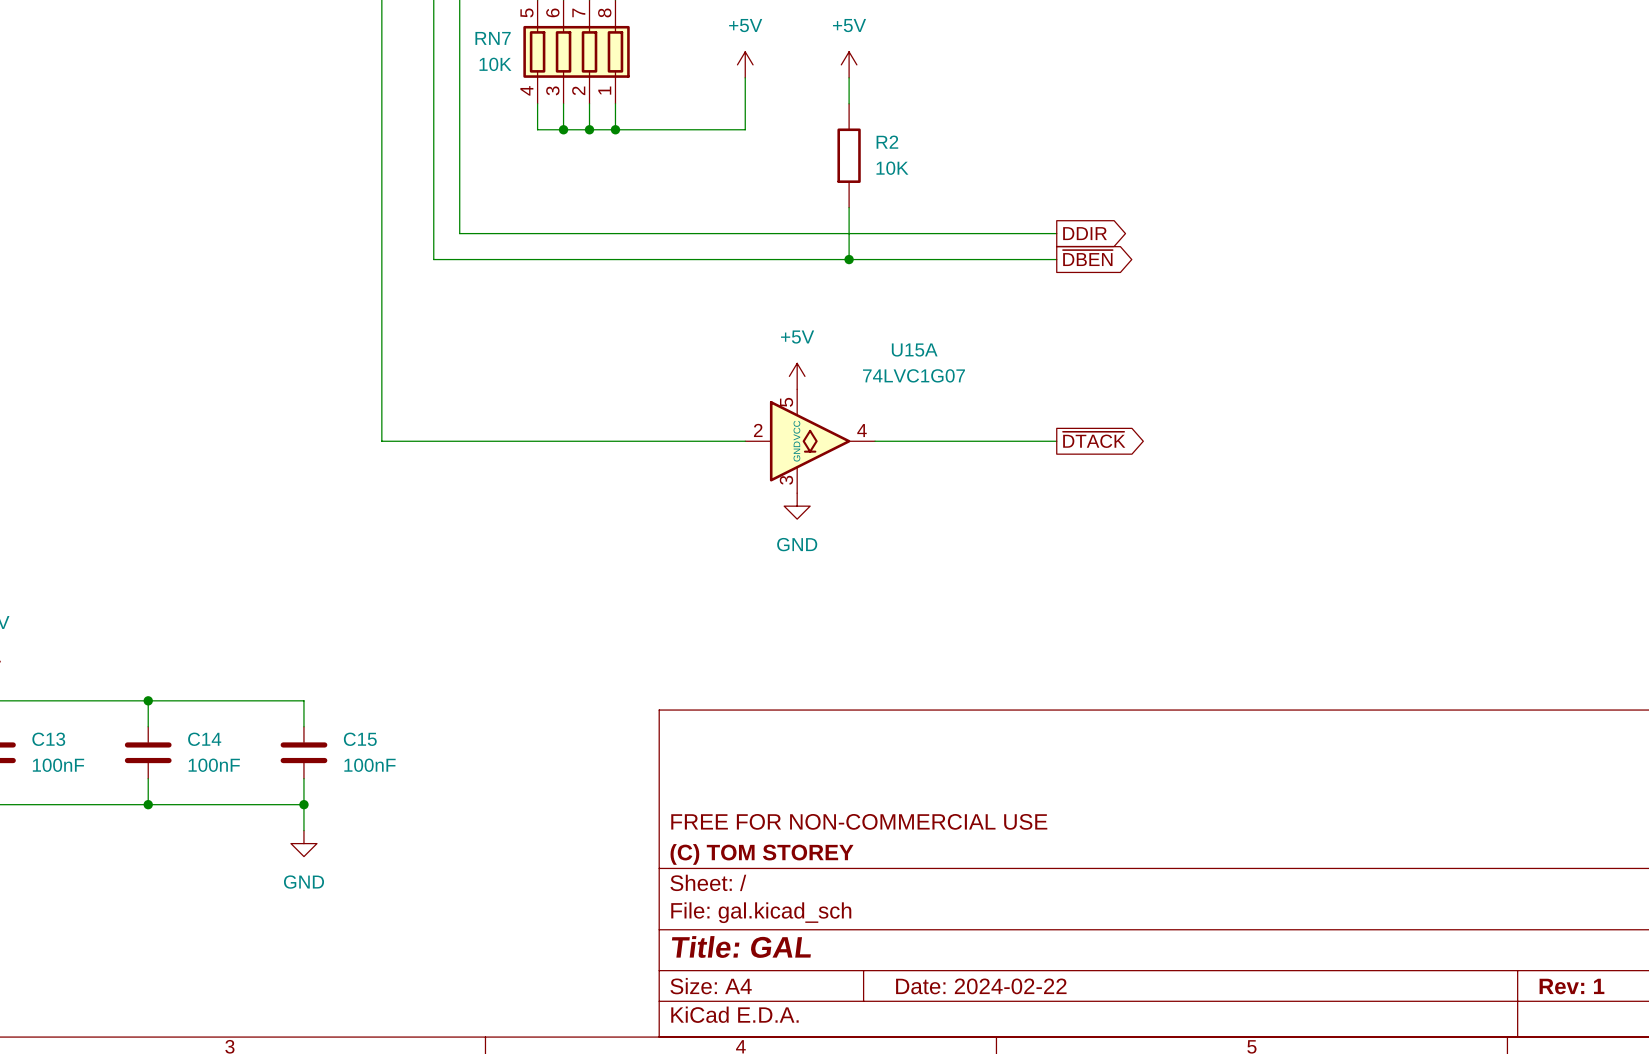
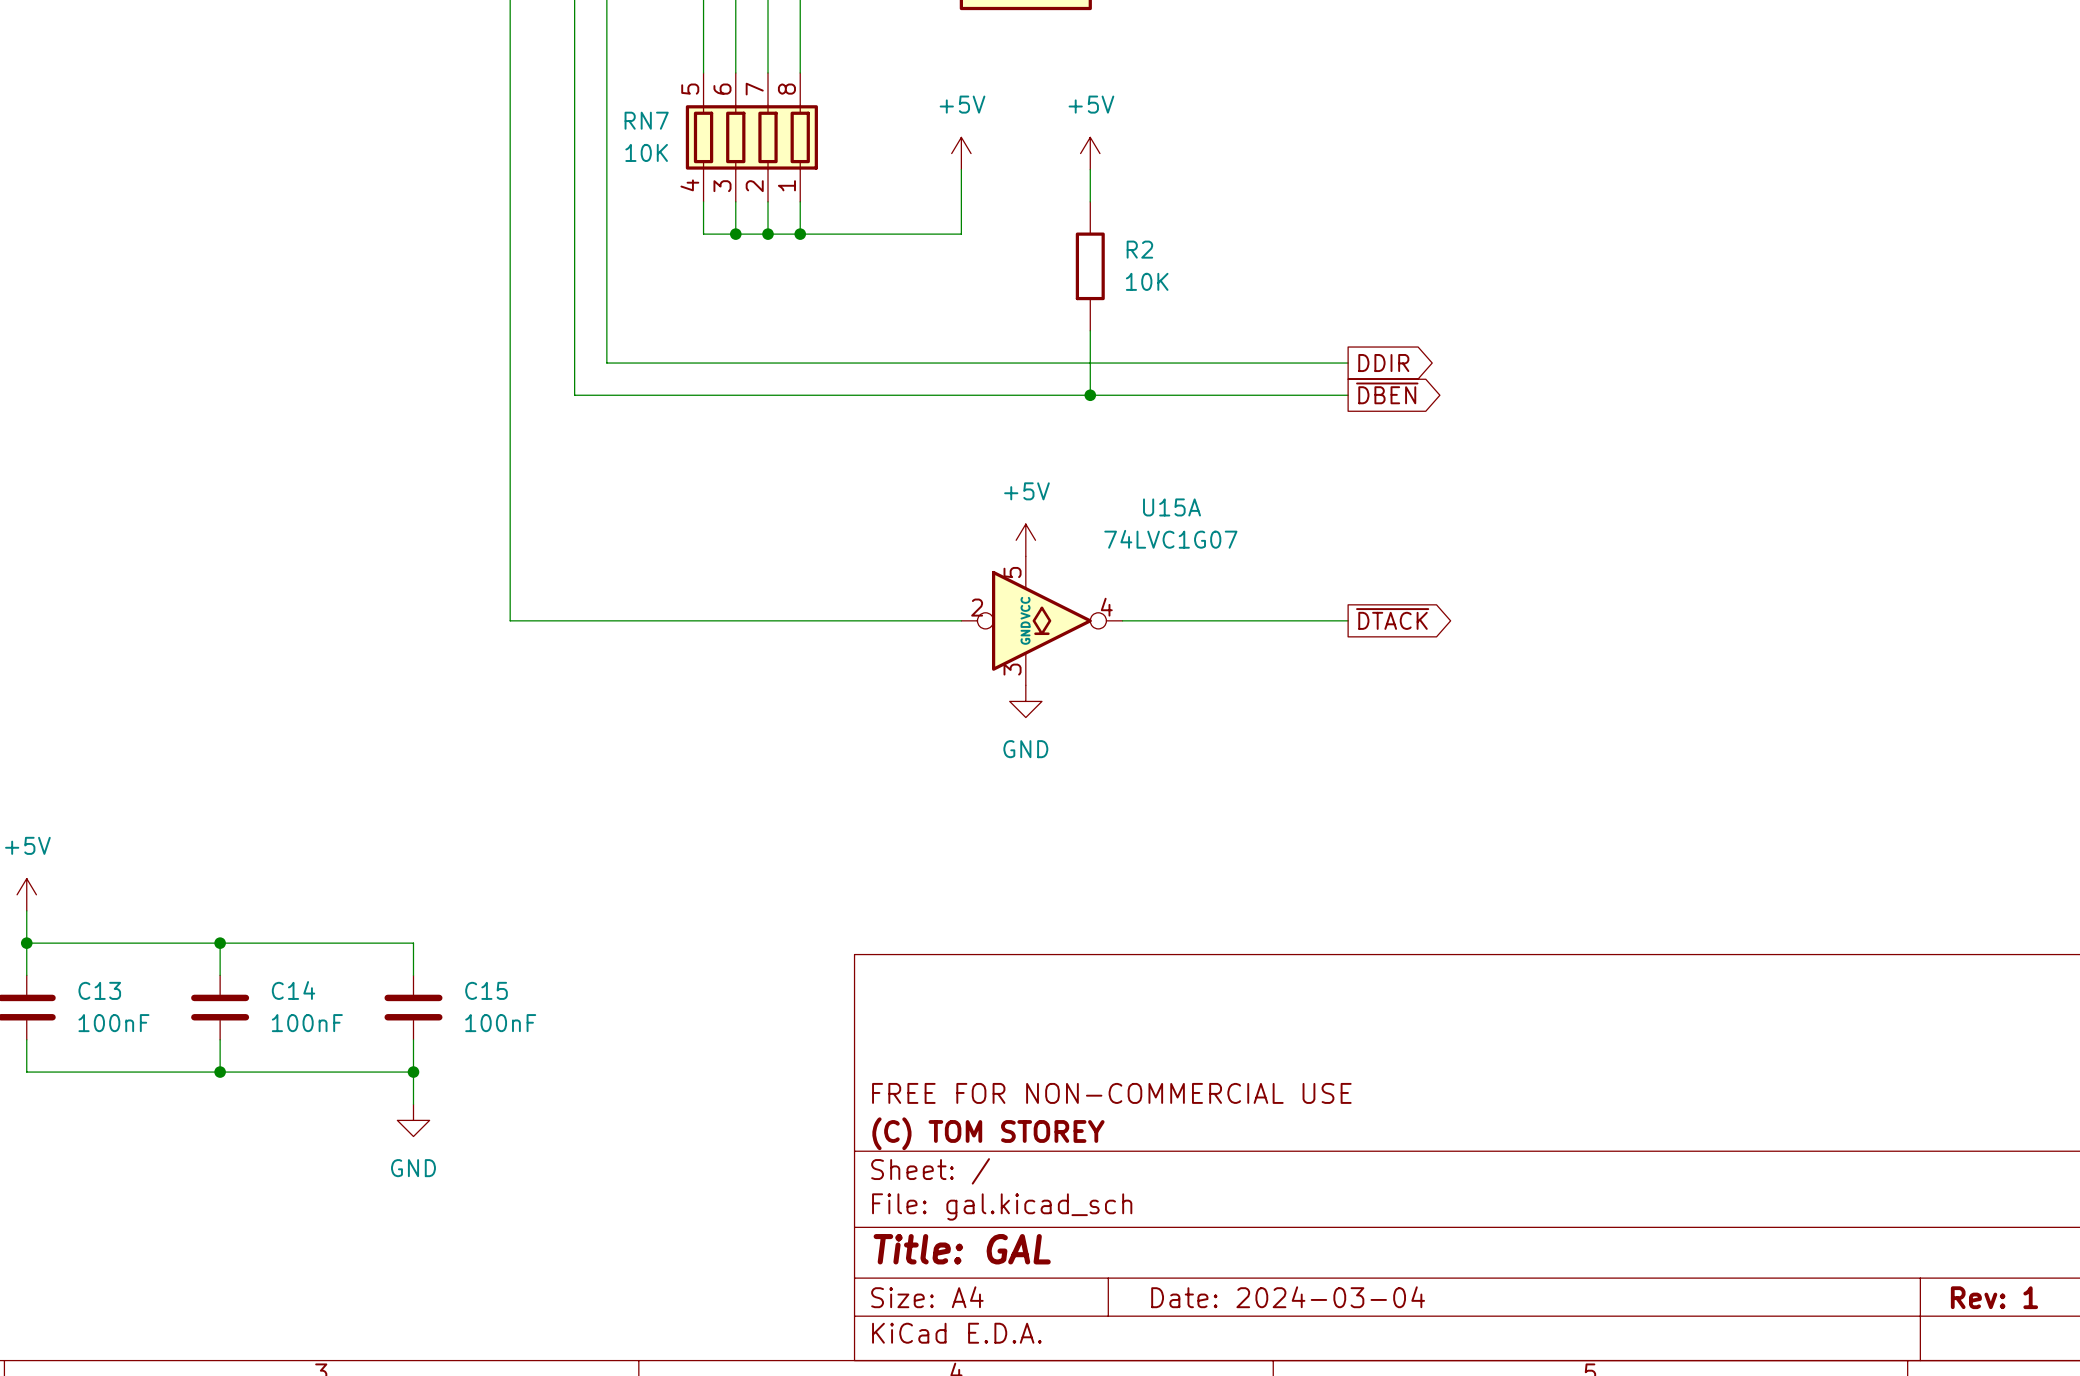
U15A symbol: [745, 401, 876, 482] -> [961, 570, 1123, 671]
title block: Date: 2024-02-22 (981, 986) -> Date: 2024-03-04 (1288, 1297)

